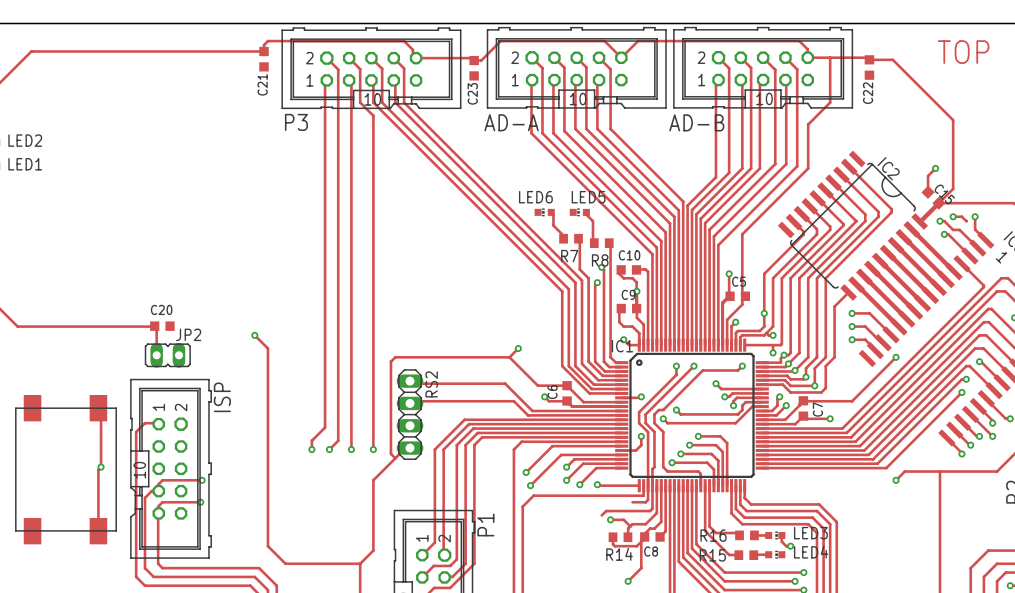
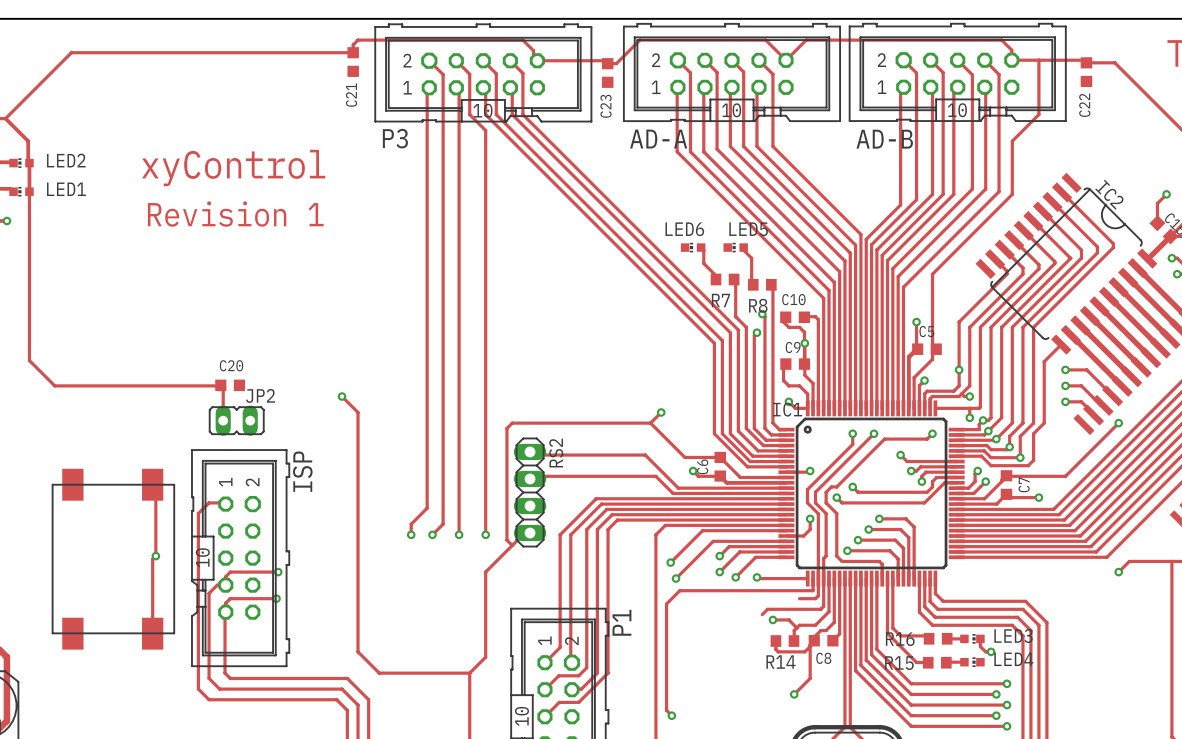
text: none -> xyControl (233, 167)
text: none -> Revision 1 (235, 214)

